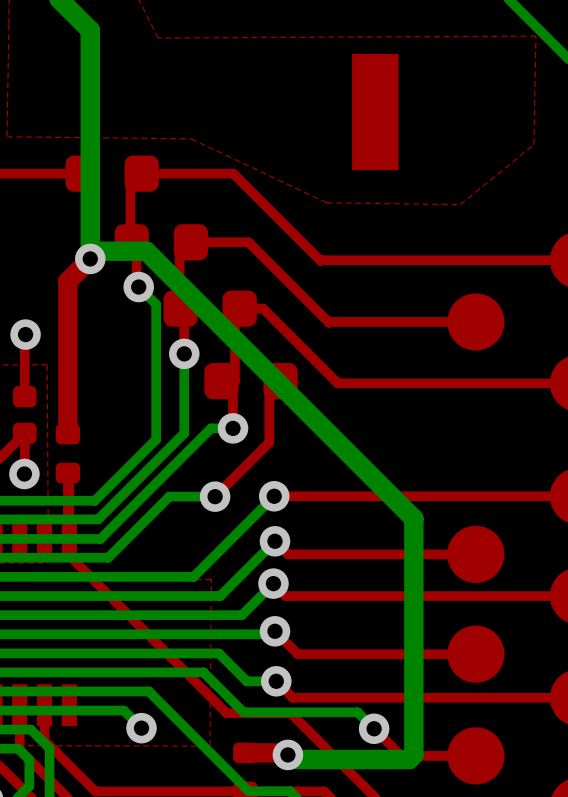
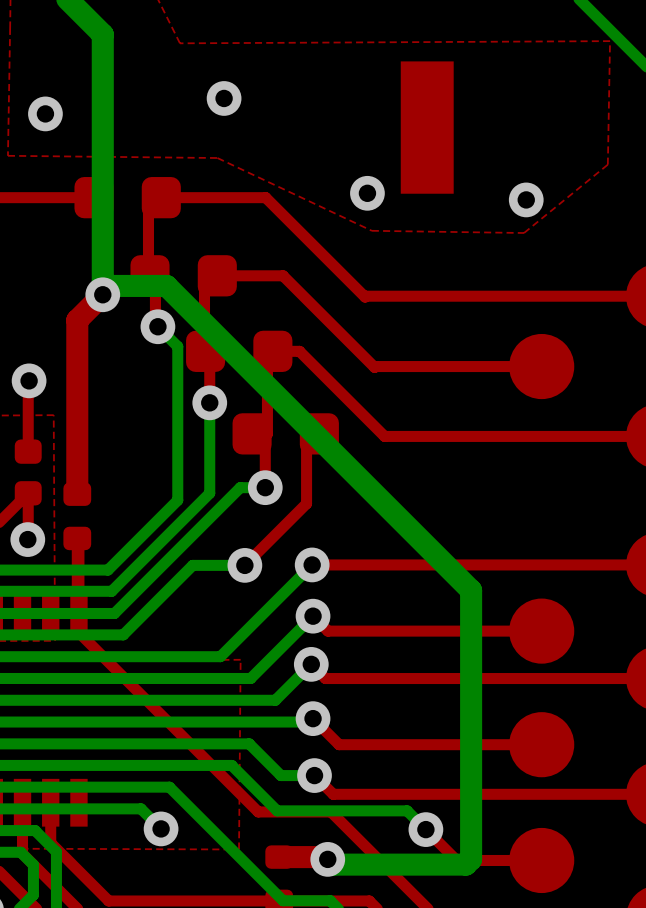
via: none -> (224, 98)
via: none -> (45, 113)
via: none -> (367, 193)
via: none -> (526, 199)

